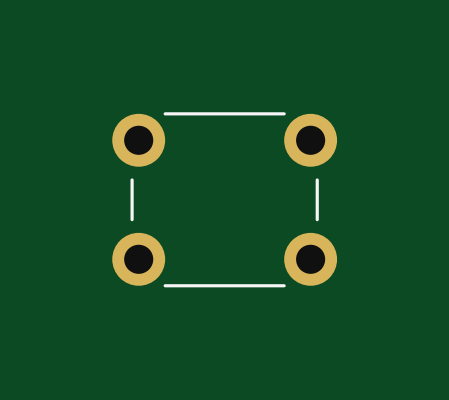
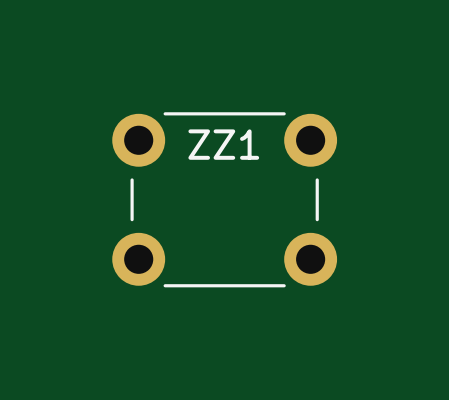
ZZ1 name: none -> ZZ1 (223, 144)

